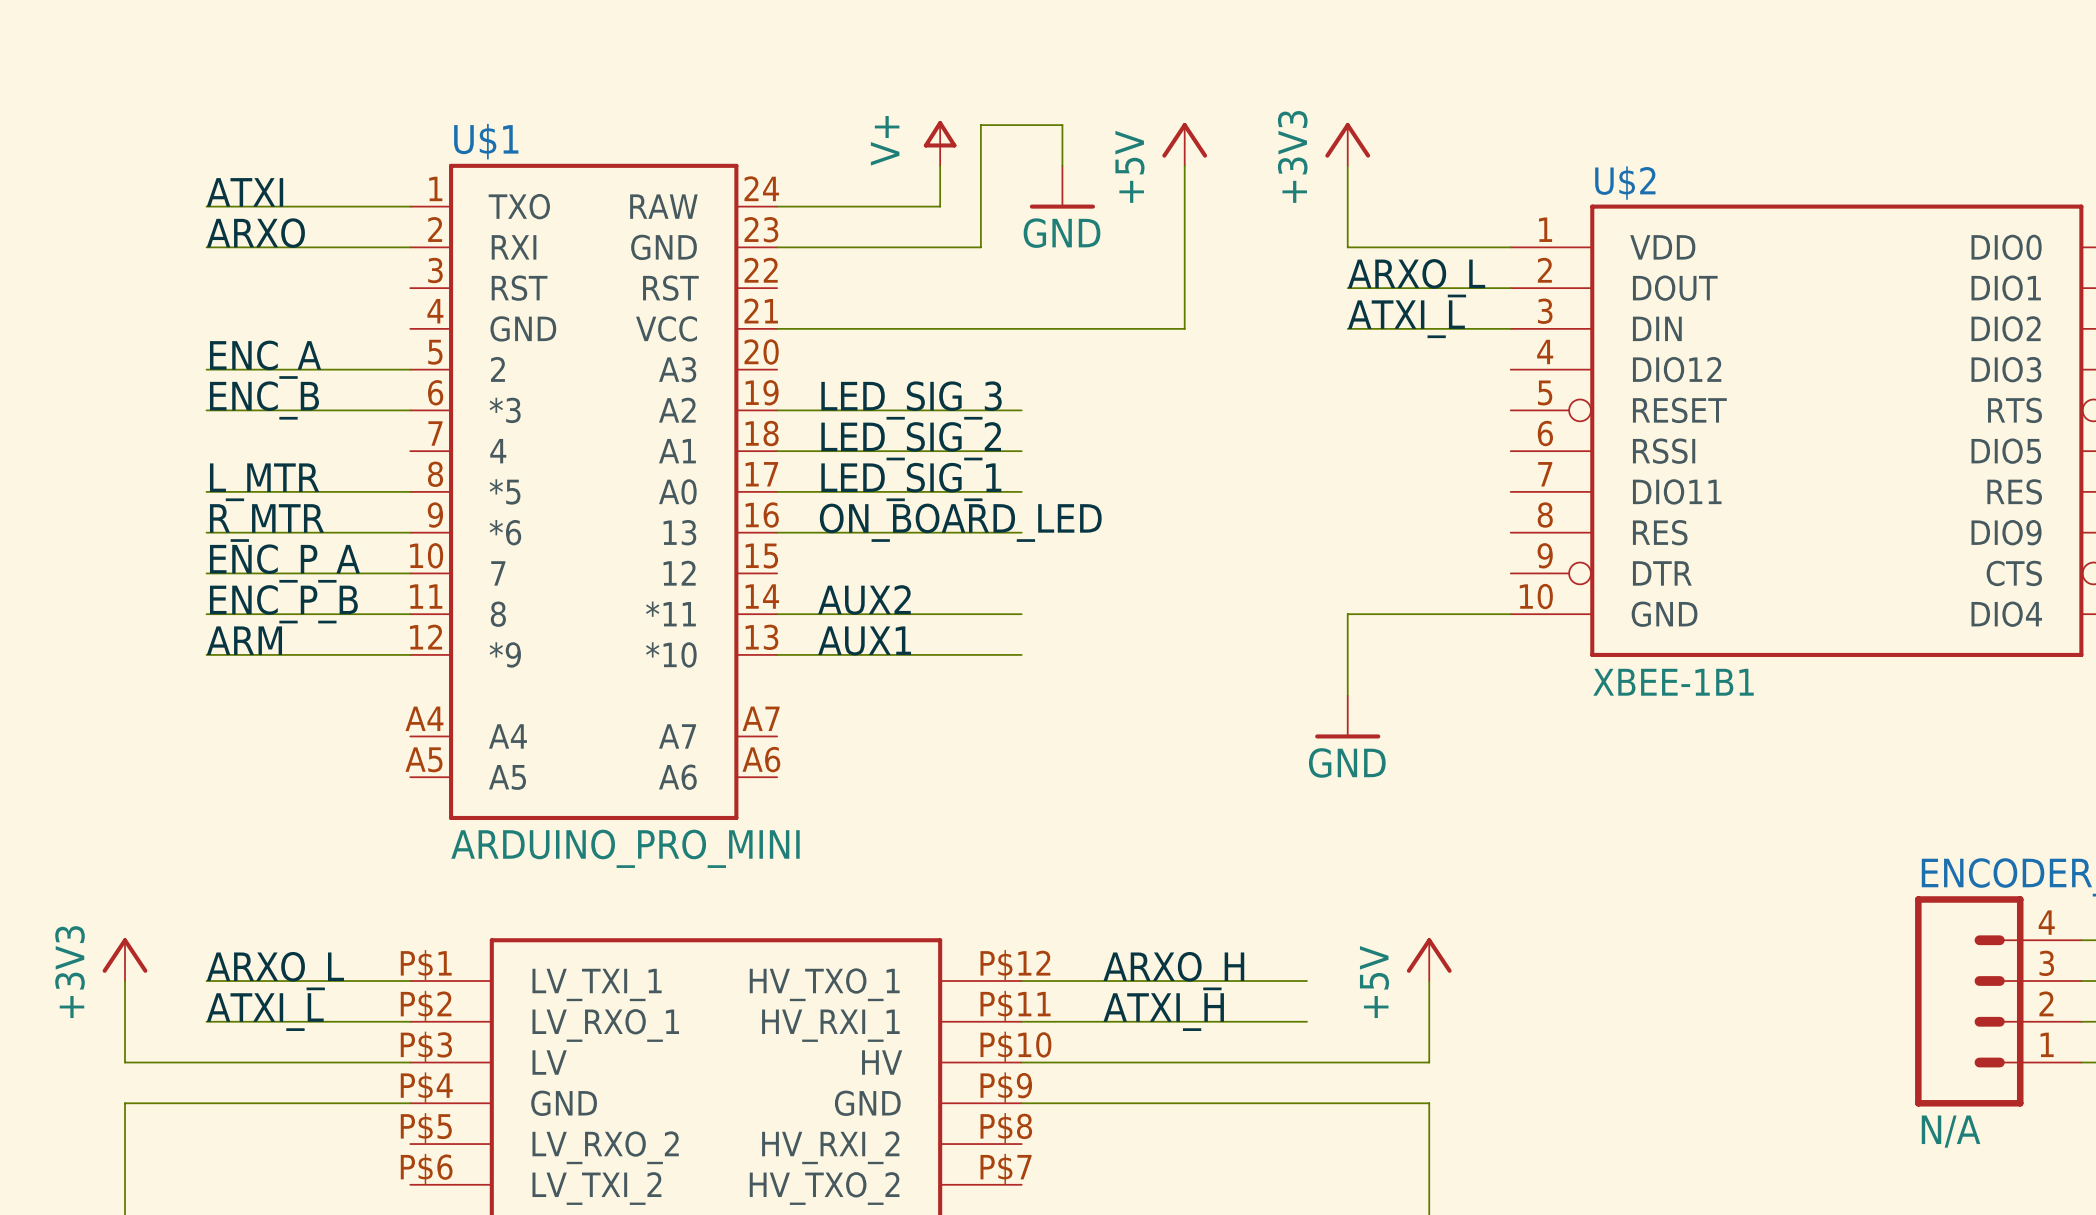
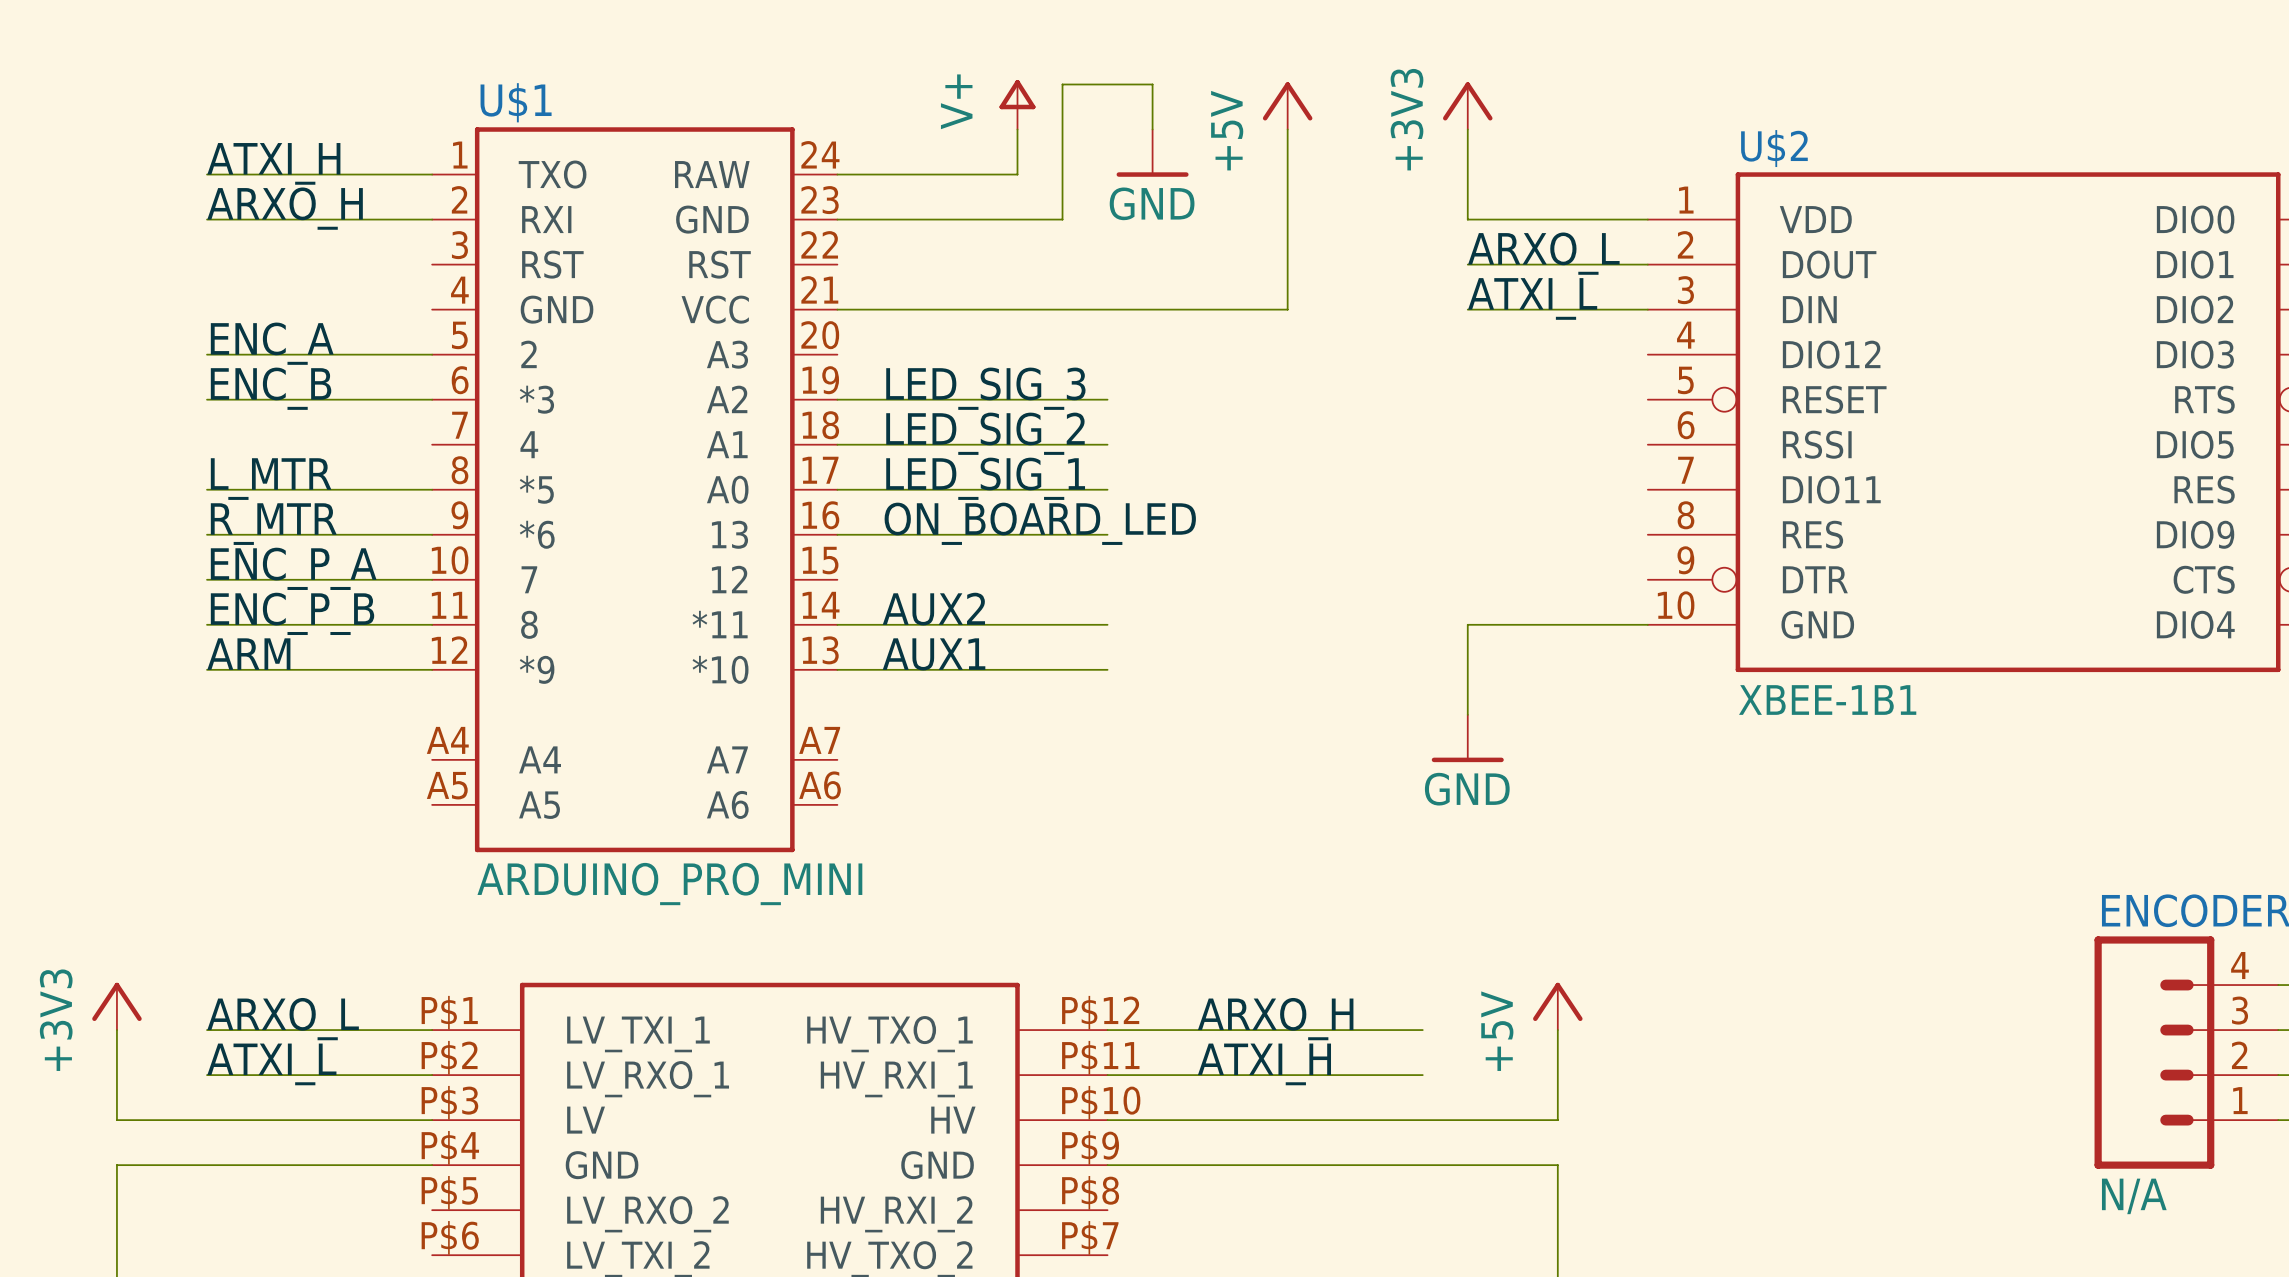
label: ATXI (244, 192) -> ATXI_H (273, 163)
label: ARXO (255, 233) -> ARXO_H (285, 208)

